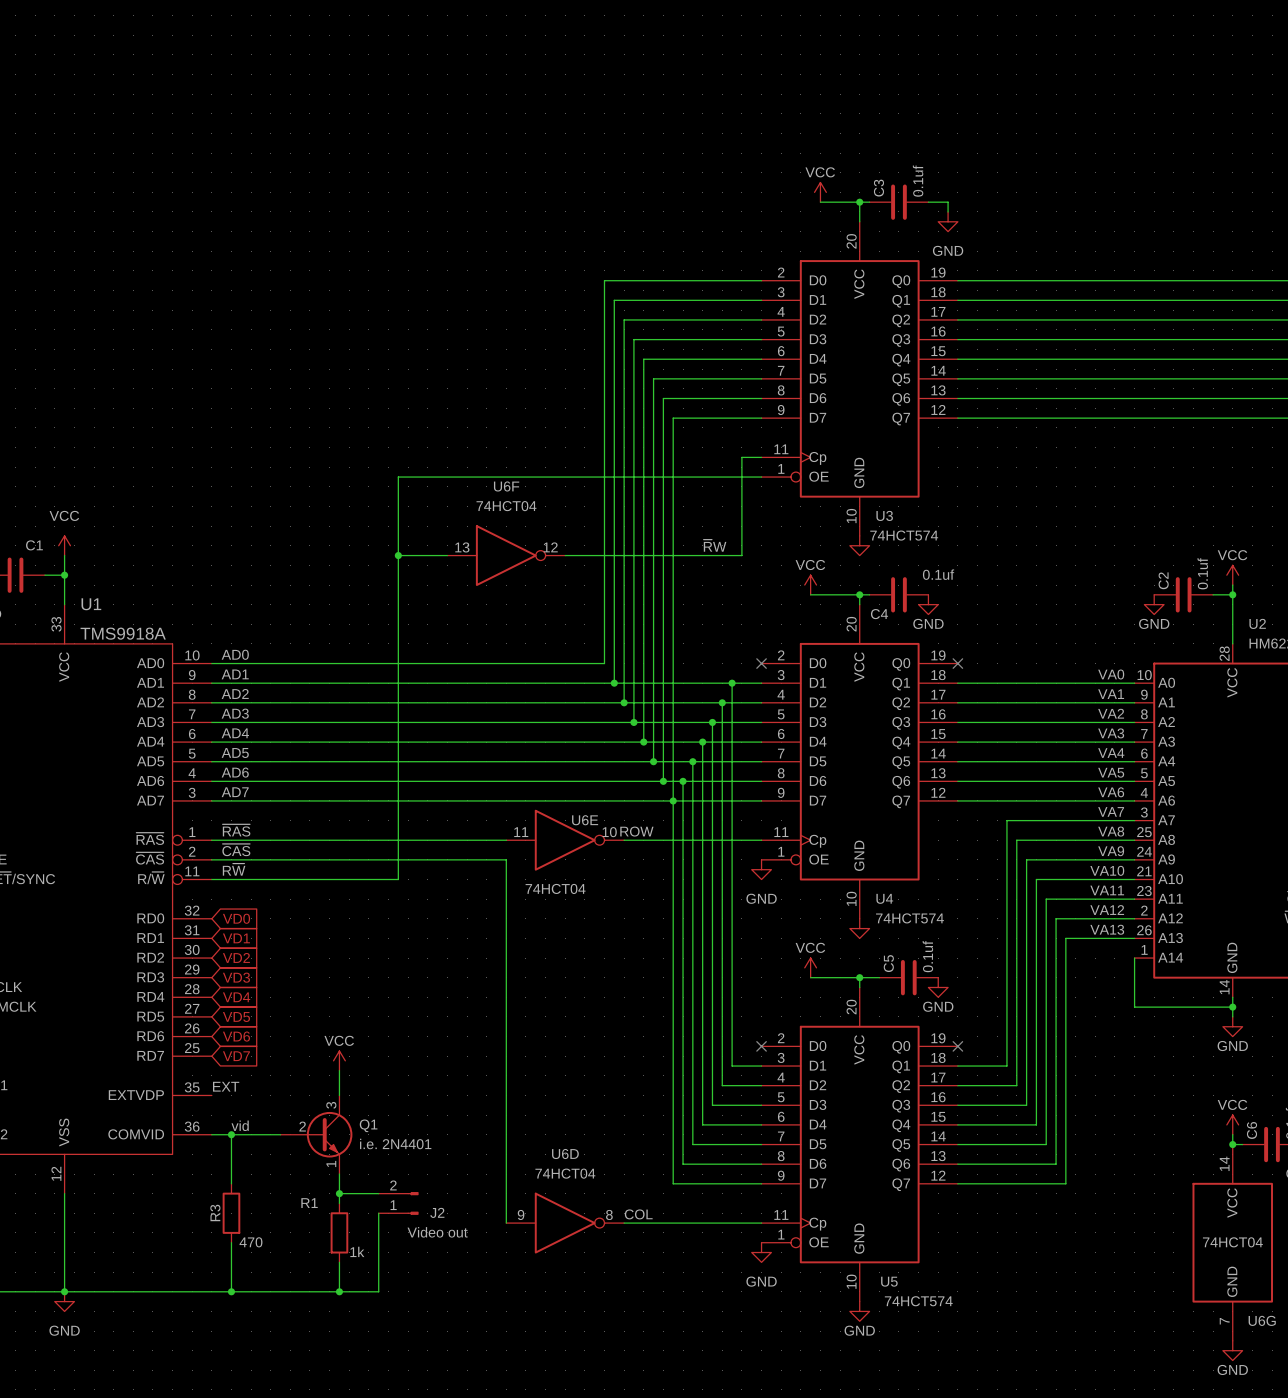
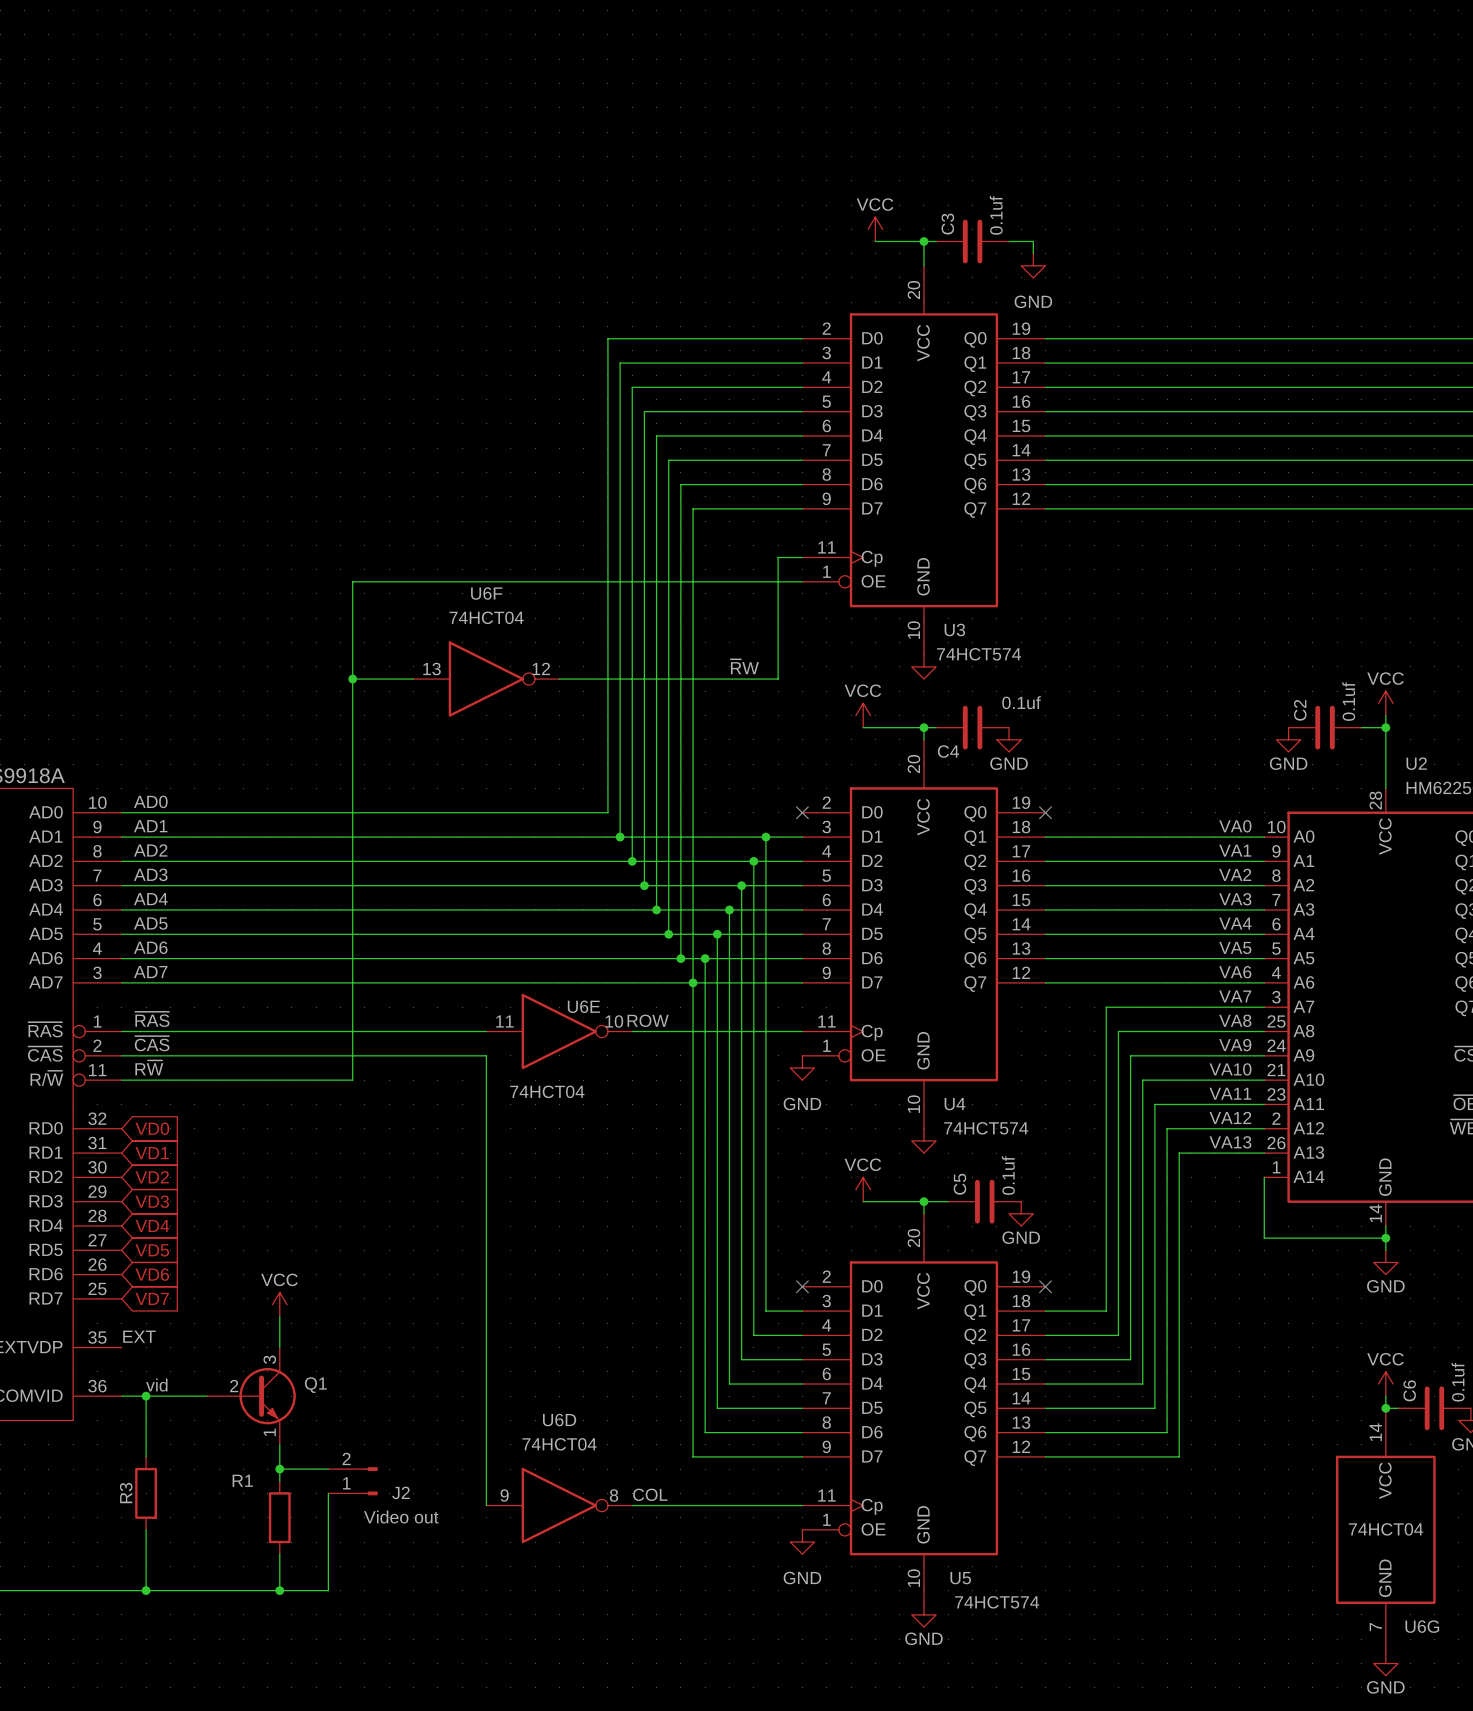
Q1 value: i.e. 2N4401 (395, 1143) -> none
R3 value: 470 (250, 1242) -> none
R1 value: 1k (357, 1251) -> none

